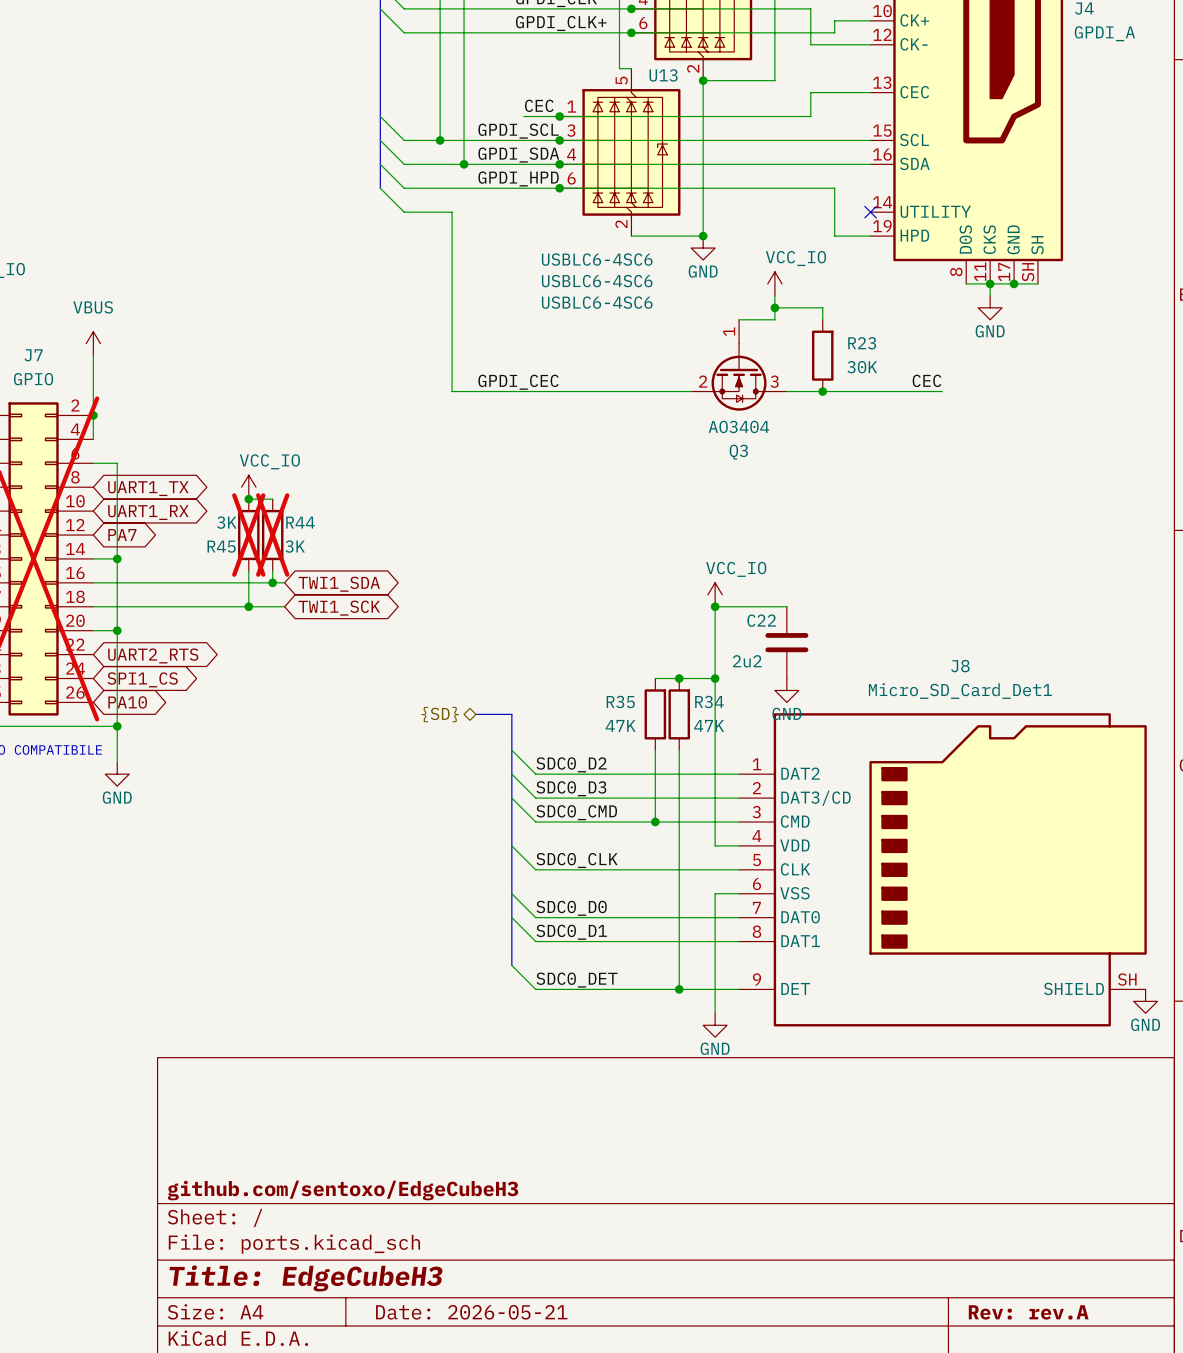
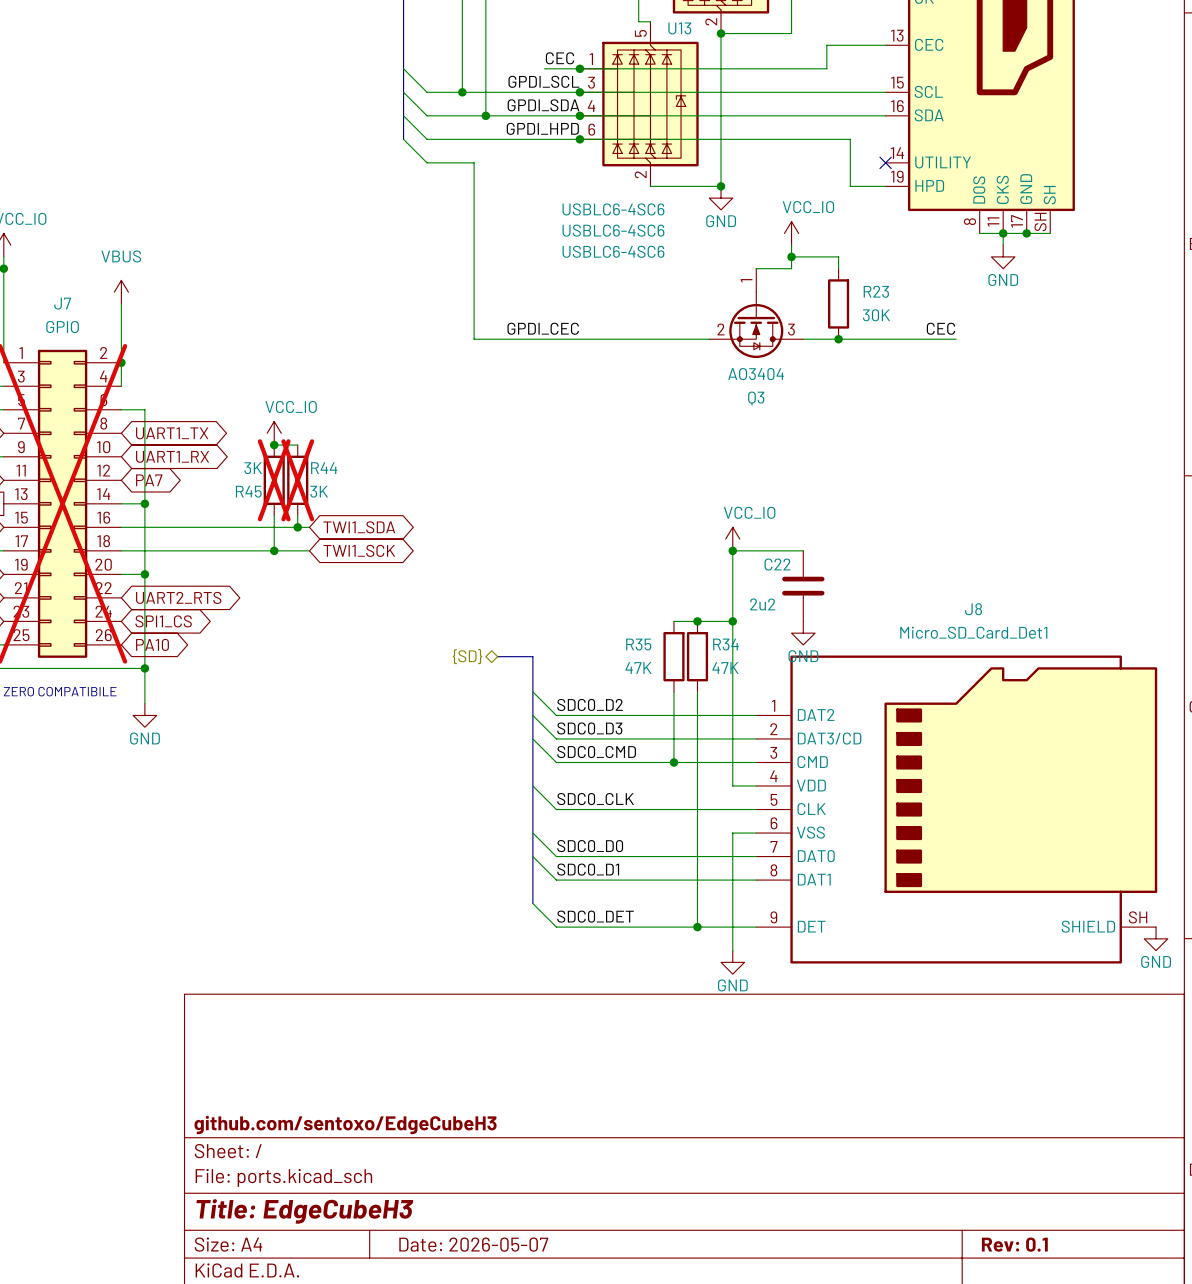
title block: Date: 2026-05-21 (471, 1312) -> Date: 2026-05-07 (473, 1244)
title block: Rev: rev.A (1028, 1312) -> Rev: 0.1 (1014, 1244)

